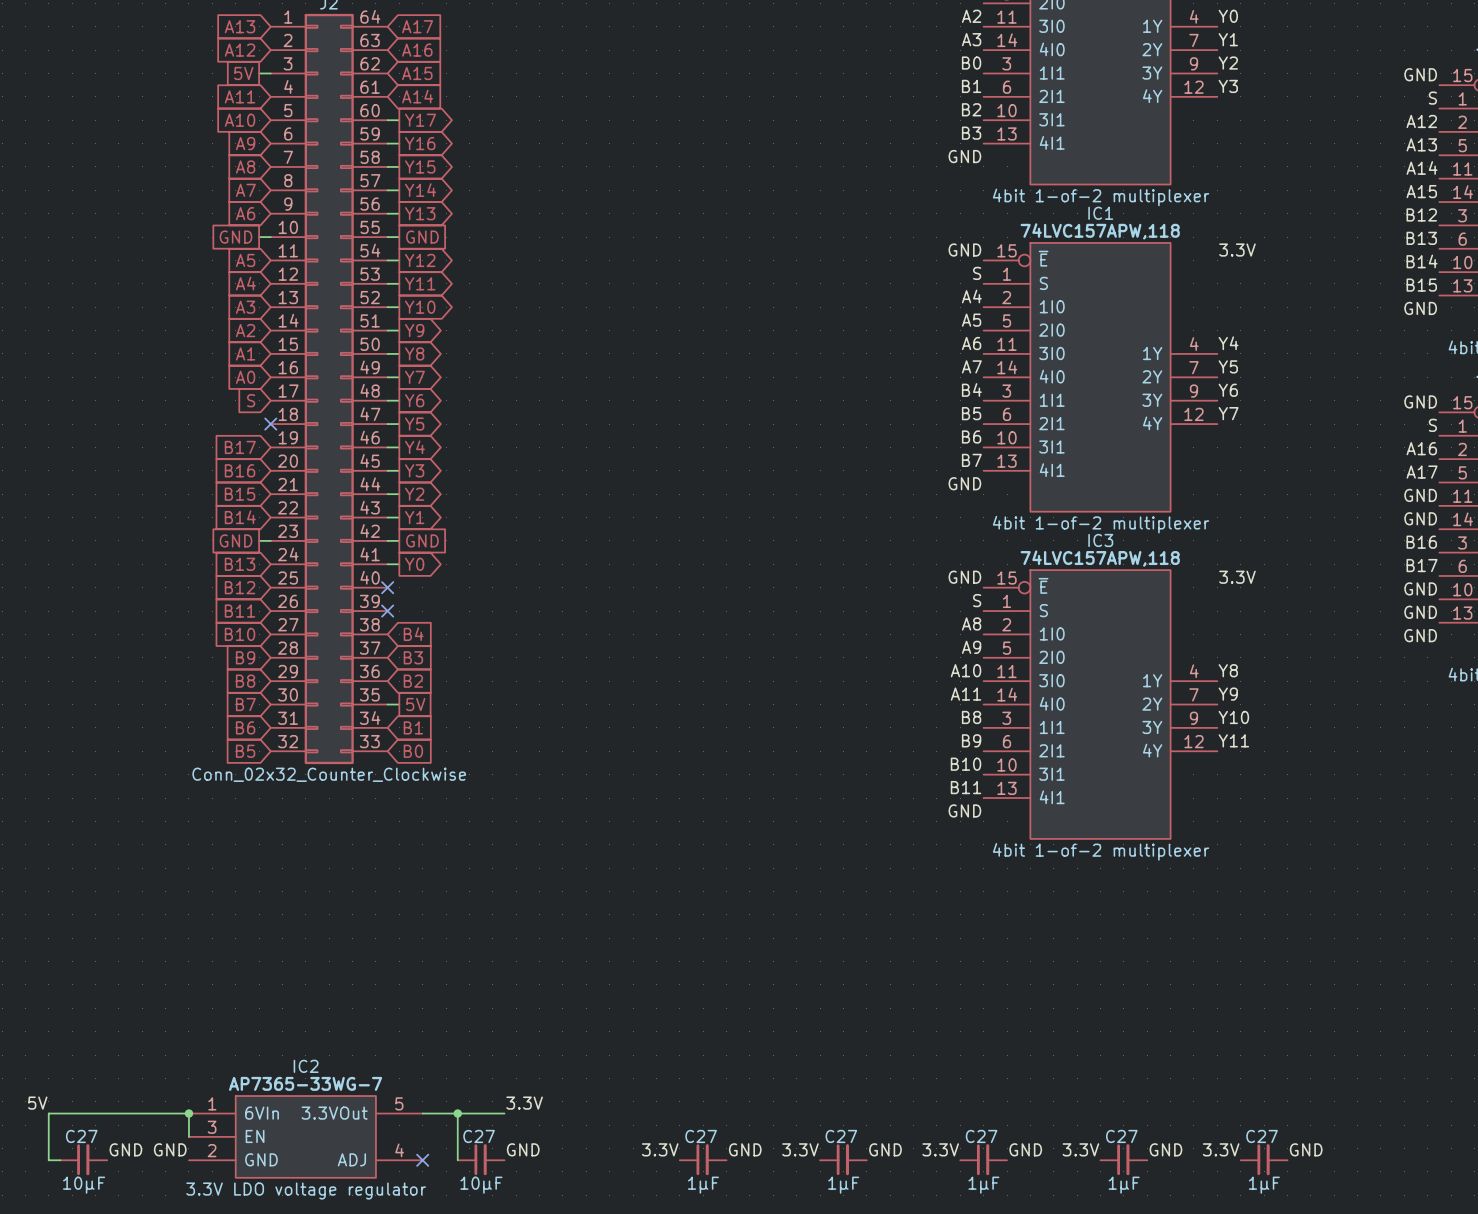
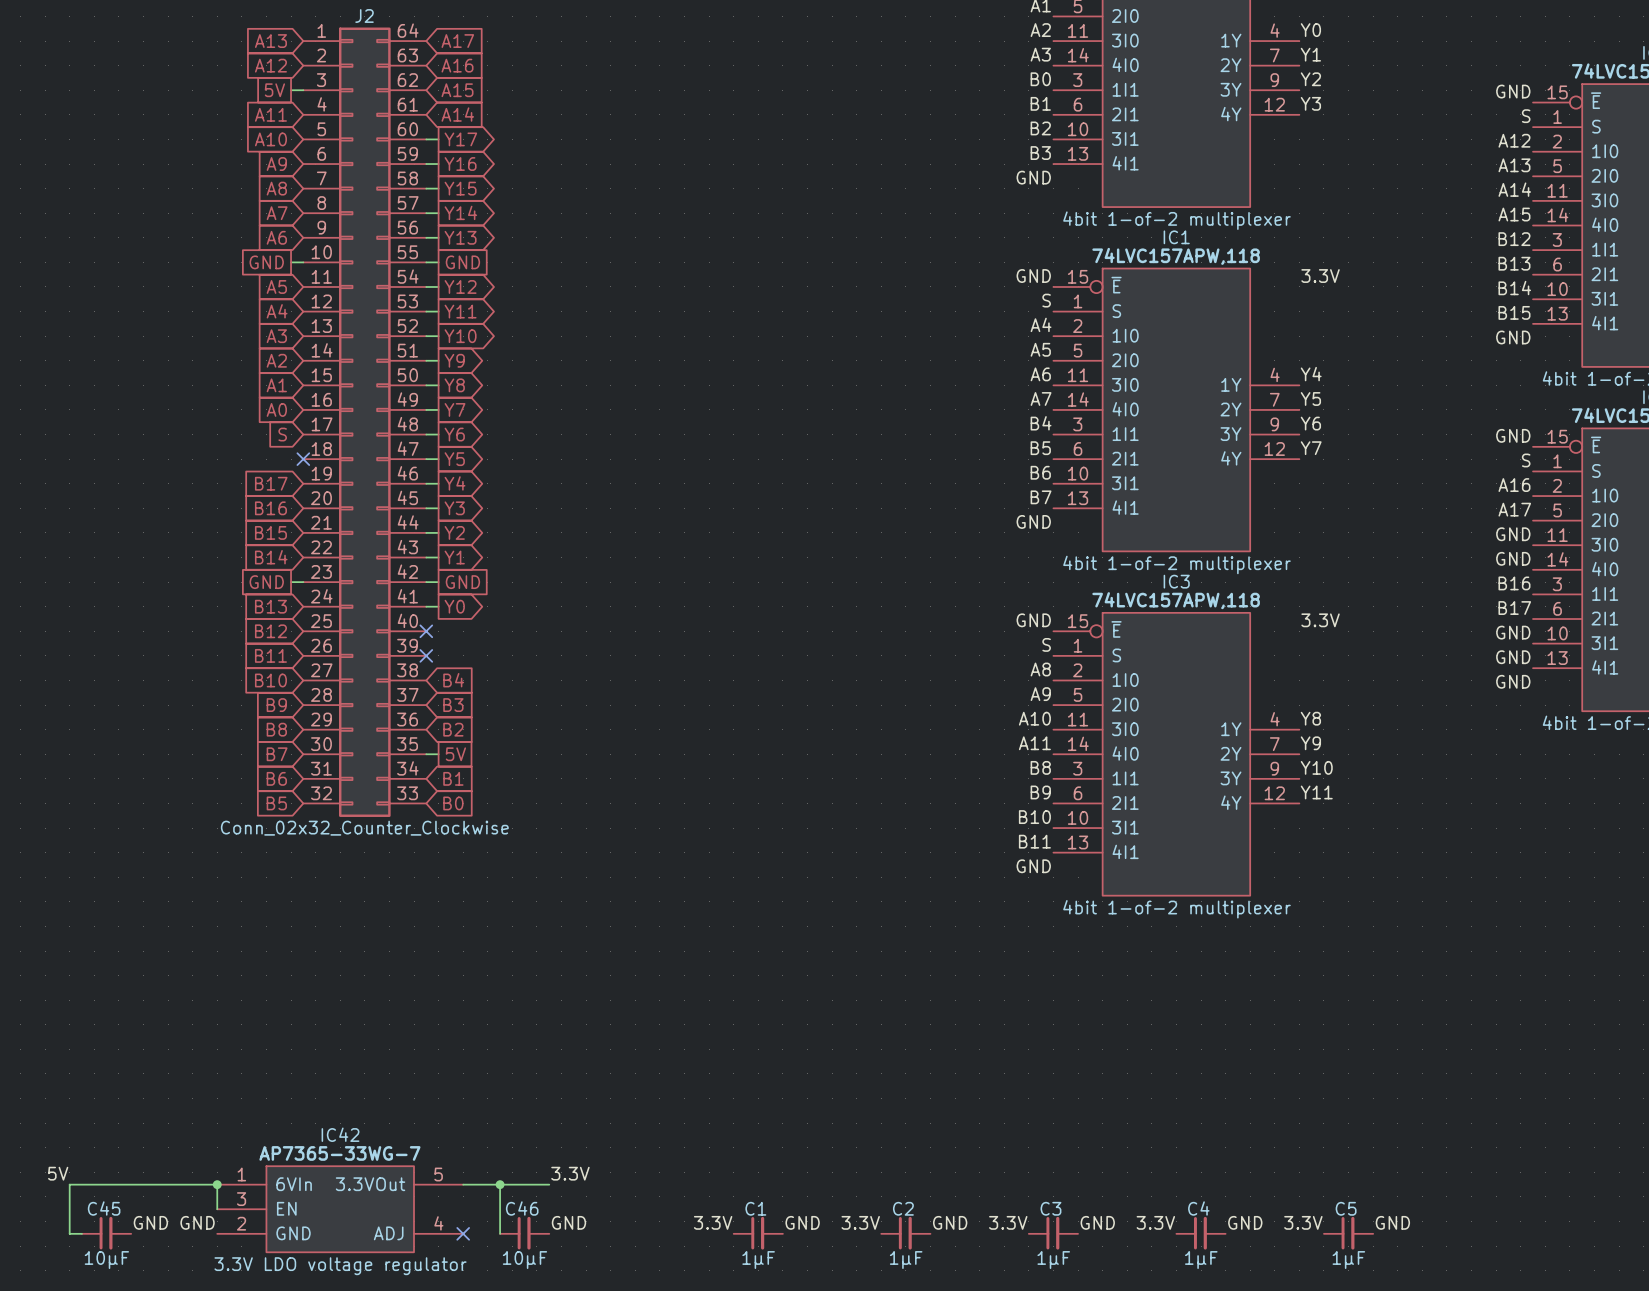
IC2 name: IC2 (306, 1066) -> IC42 (340, 1134)
C27 name: C27 (81, 1136) -> C45 (104, 1208)
C27 name: C27 (479, 1136) -> C46 (522, 1208)
C27 name: C27 (701, 1136) -> C1 (755, 1208)
C27 name: C27 (841, 1136) -> C2 (903, 1208)
C27 name: C27 (981, 1136) -> C3 (1050, 1208)
C27 name: C27 (1121, 1136) -> C4 (1198, 1208)
C27 name: C27 (1262, 1136) -> C5 (1346, 1208)

